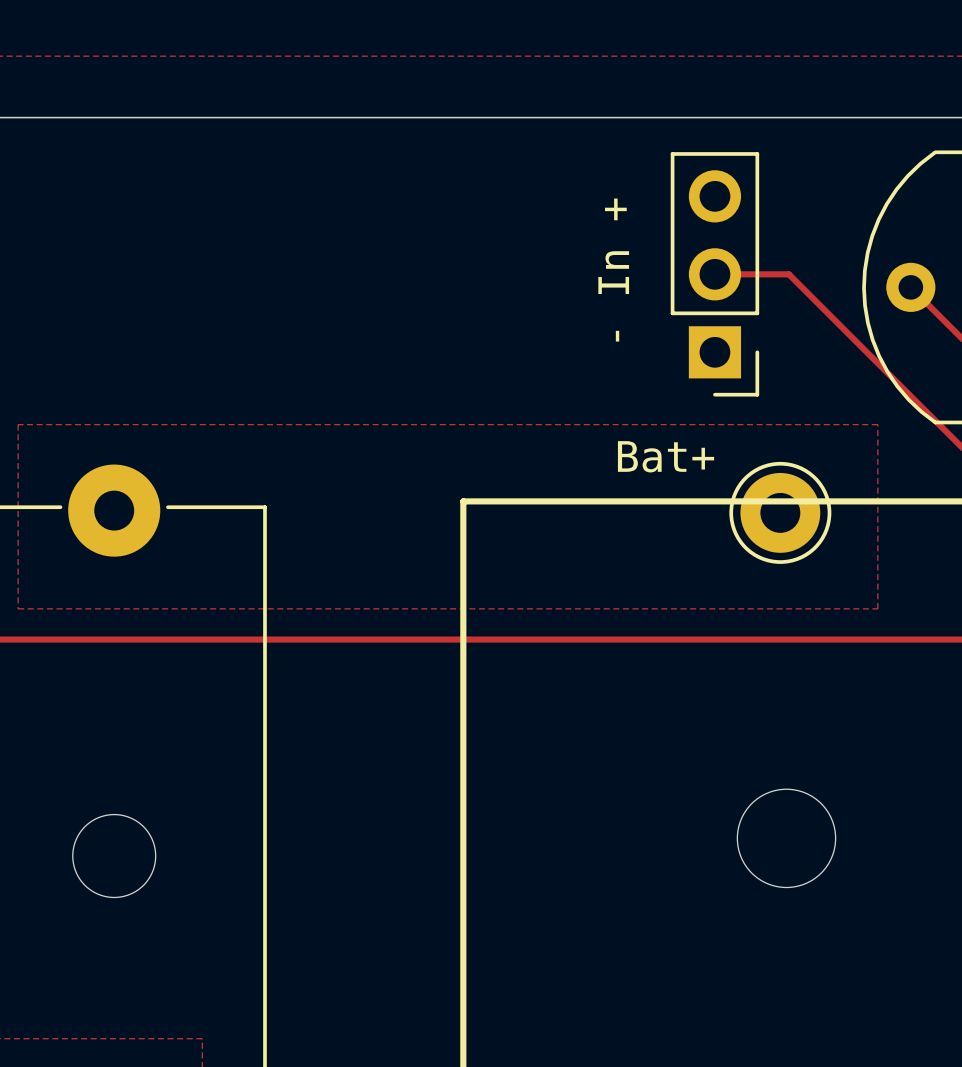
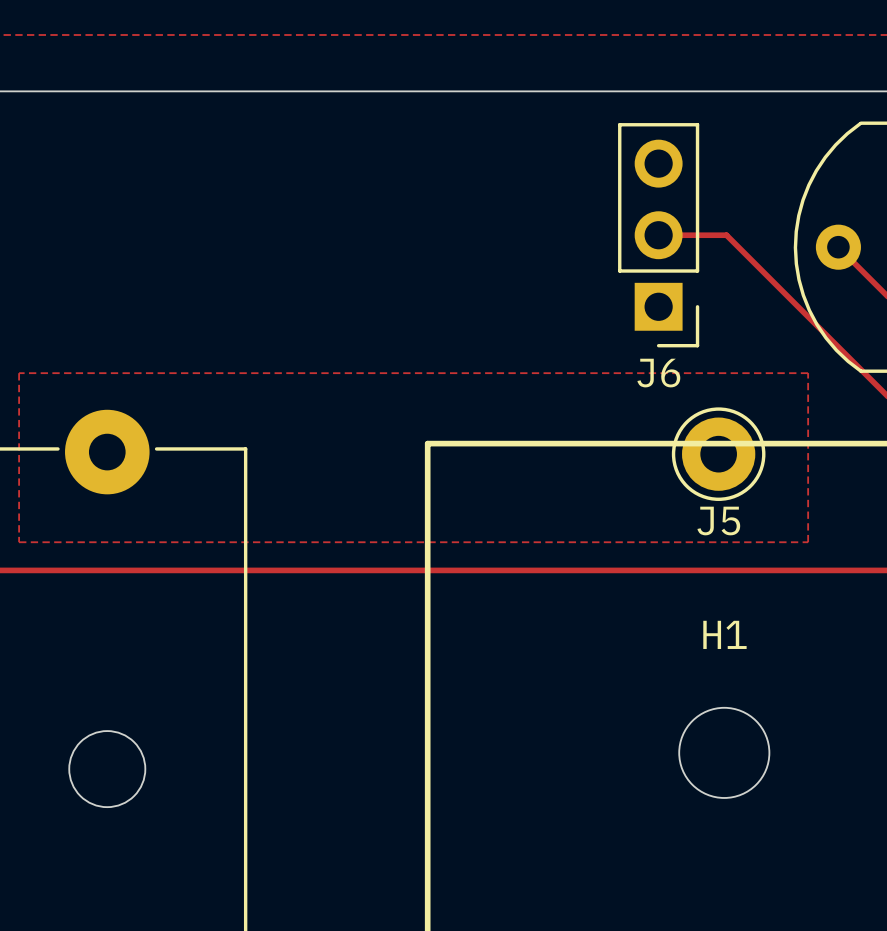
J6 value: - In + (613, 270) -> none
J6 name: none -> J6 (658, 373)
J5 value: Bat+ (666, 456) -> none
J5 name: none -> J5 (718, 521)
H1 name: none -> H1 (724, 634)

